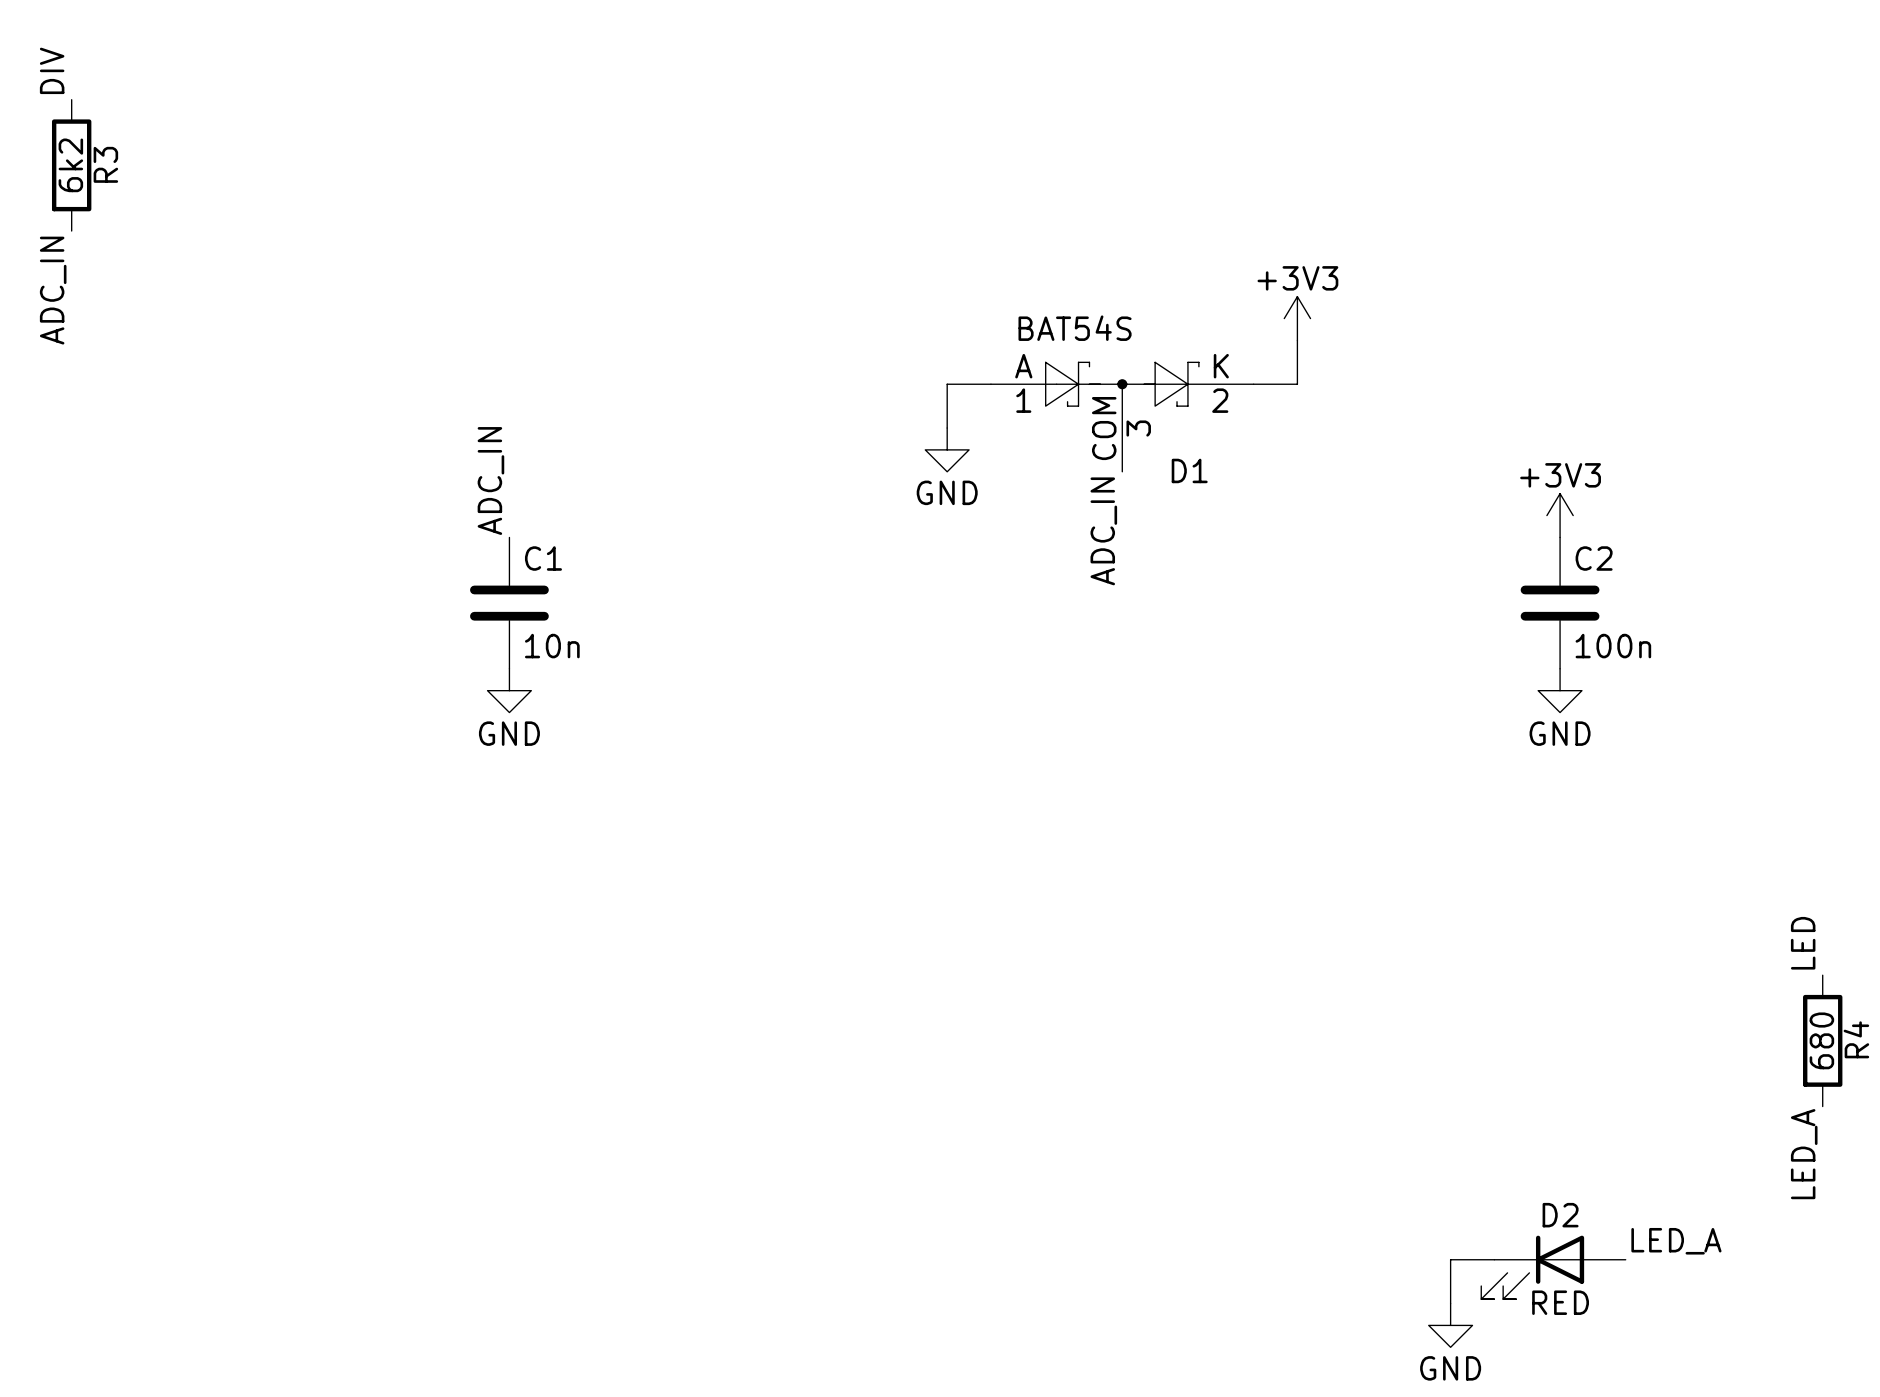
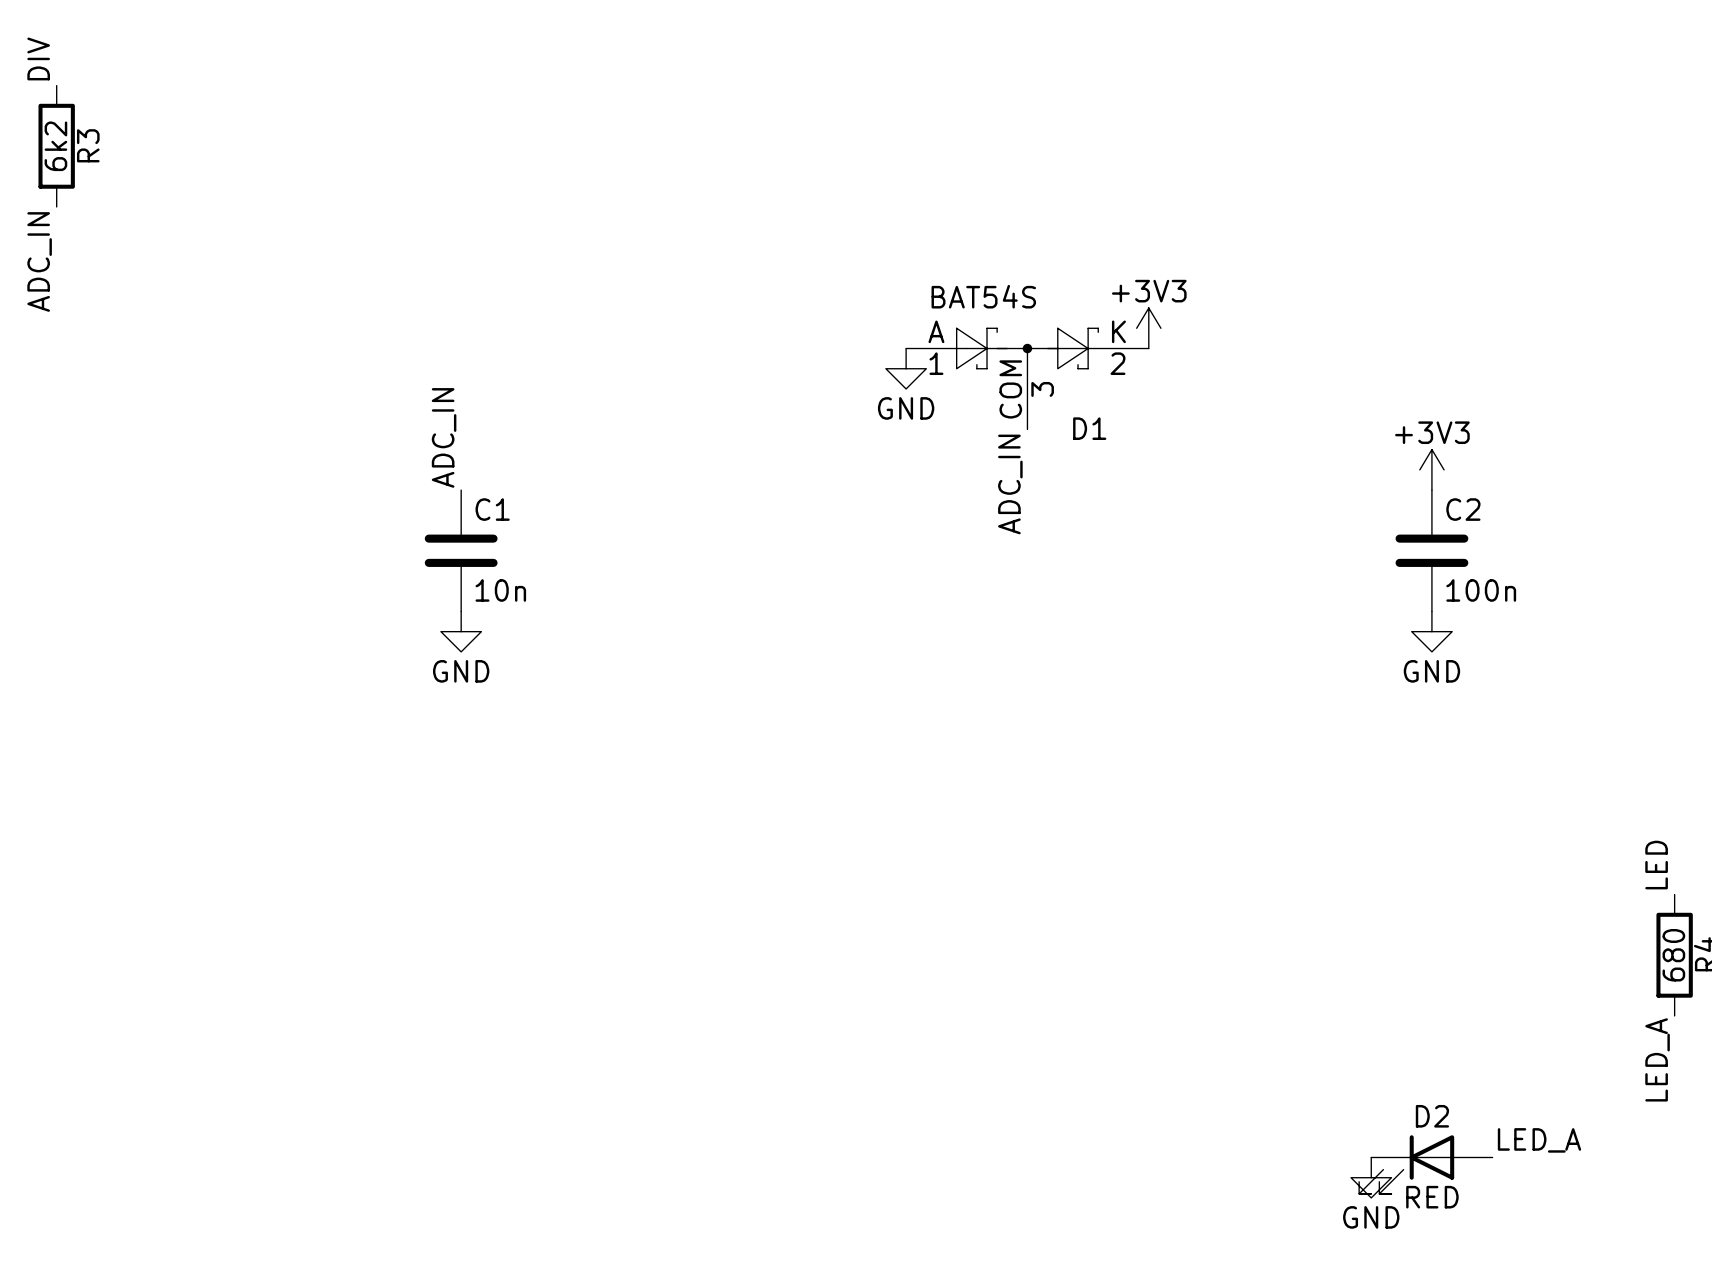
power symbol position: +3V3 (1297, 318) -> +3V3 (1148, 328)
wire: (1297, 340) (1297, 384) (1253, 384) -> none
wire: (990, 384) (947, 384) (947, 428) -> none
power symbol position: GND (947, 449) -> GND (906, 368)
wire: (1494, 1259) (1450, 1259) (1450, 1303) -> none
power symbol position: GND (1450, 1325) -> GND (1371, 1177)

